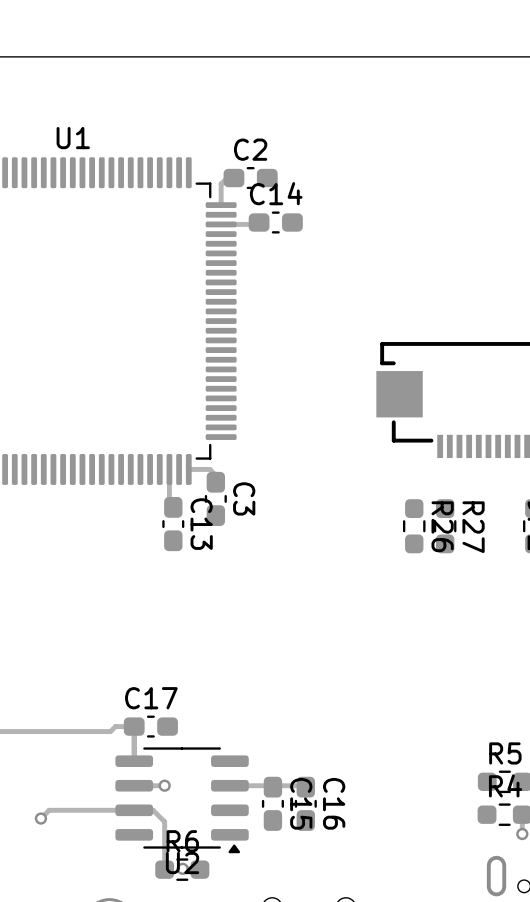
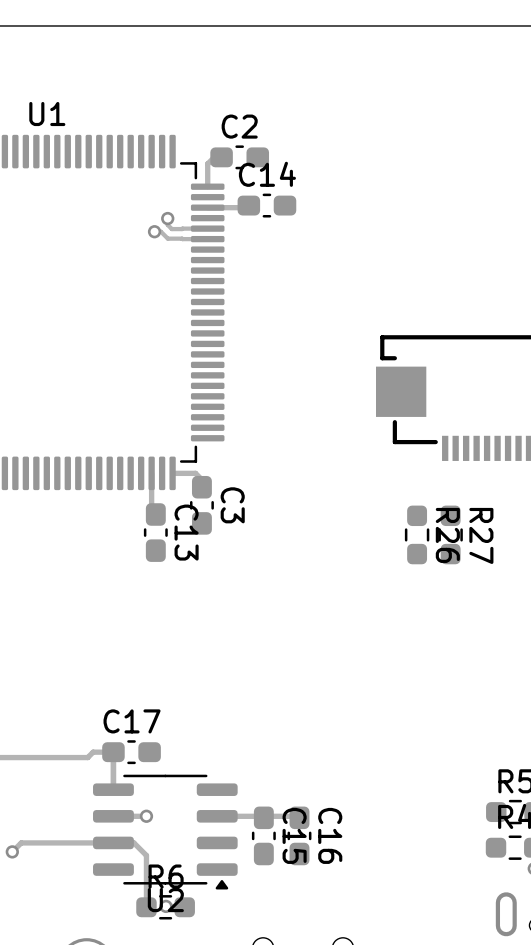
track: none -> (167, 218) (167, 224) (171, 229) (207, 228)
via: none -> (167, 218)
track: none -> (154, 231) (160, 231) (167, 238) (207, 239)
via: none -> (154, 231)

